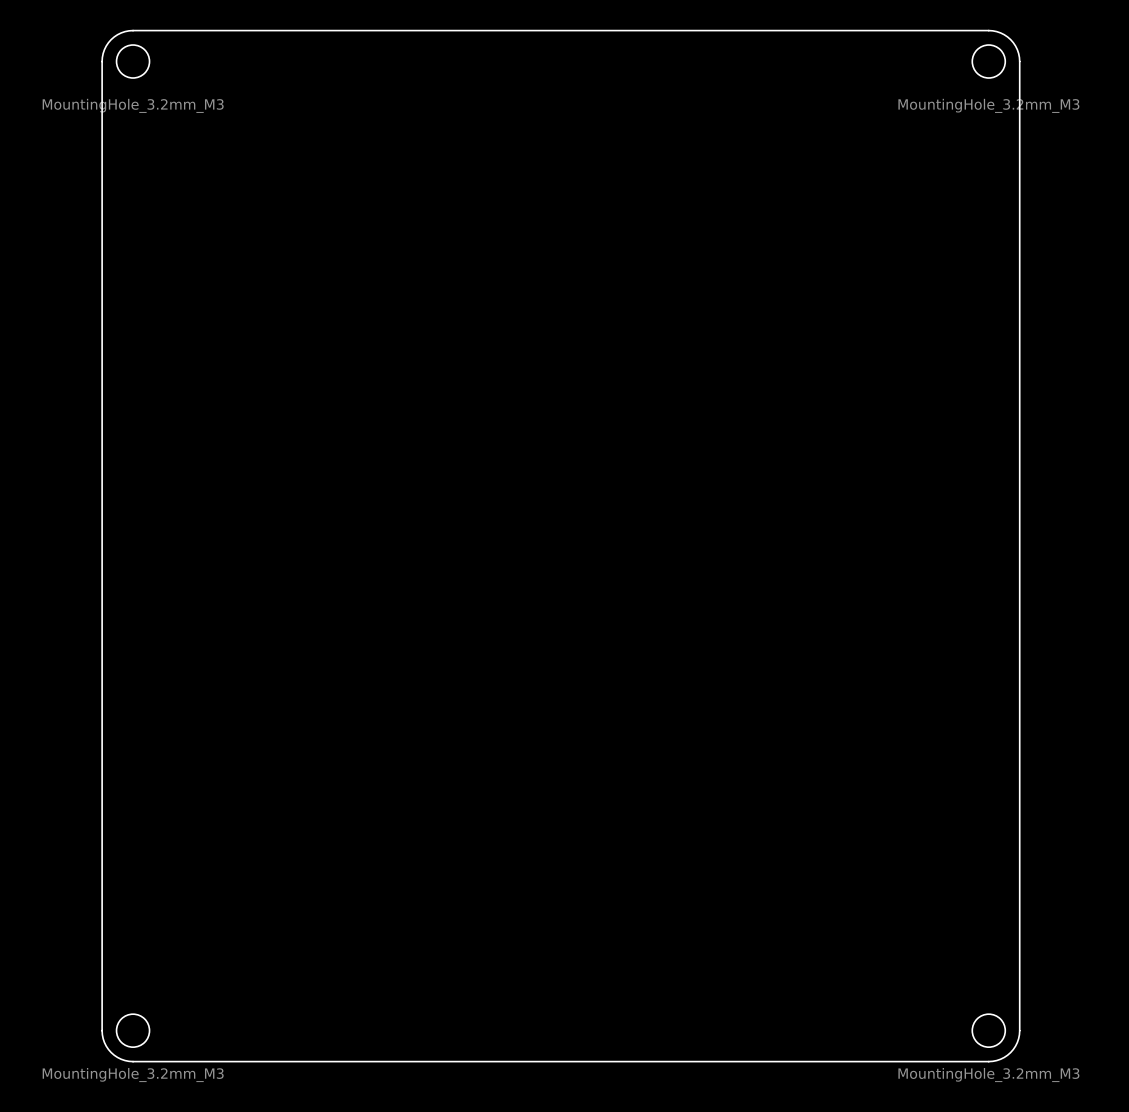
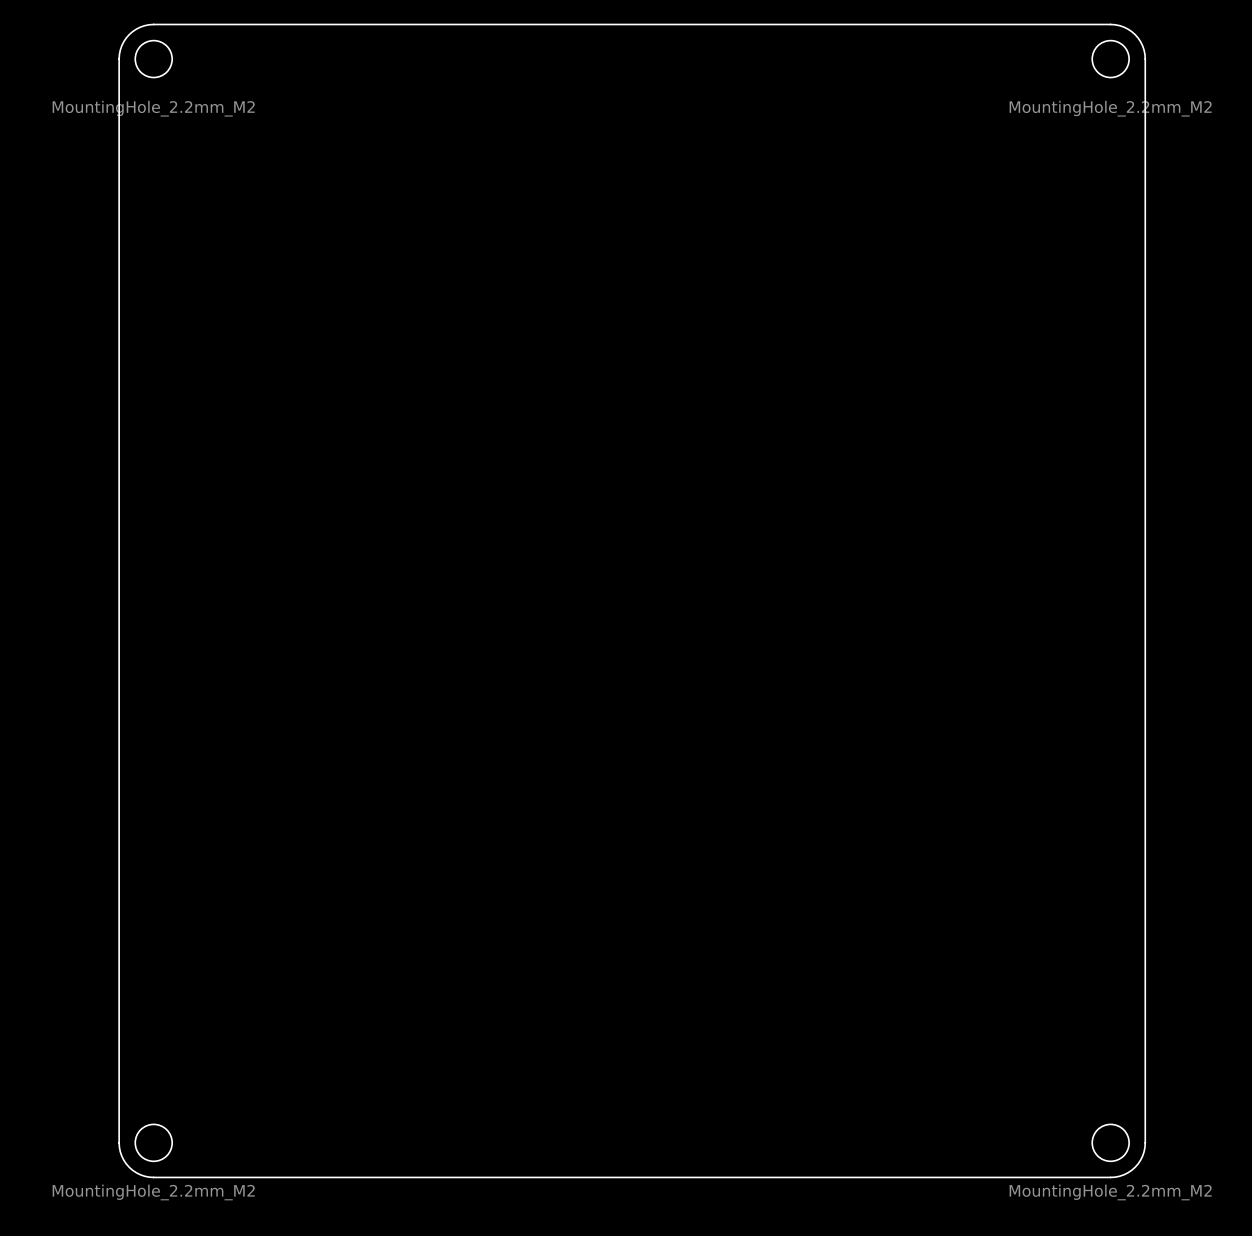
part value: MountingHole_3.2mm_M3 (133, 105) -> MountingHole_2.2mm_M2 (153, 108)
part value: MountingHole_3.2mm_M3 (988, 105) -> MountingHole_2.2mm_M2 (1110, 108)
part value: MountingHole_3.2mm_M3 (133, 1075) -> MountingHole_2.2mm_M2 (153, 1192)
part value: MountingHole_3.2mm_M3 (988, 1075) -> MountingHole_2.2mm_M2 (1110, 1192)

